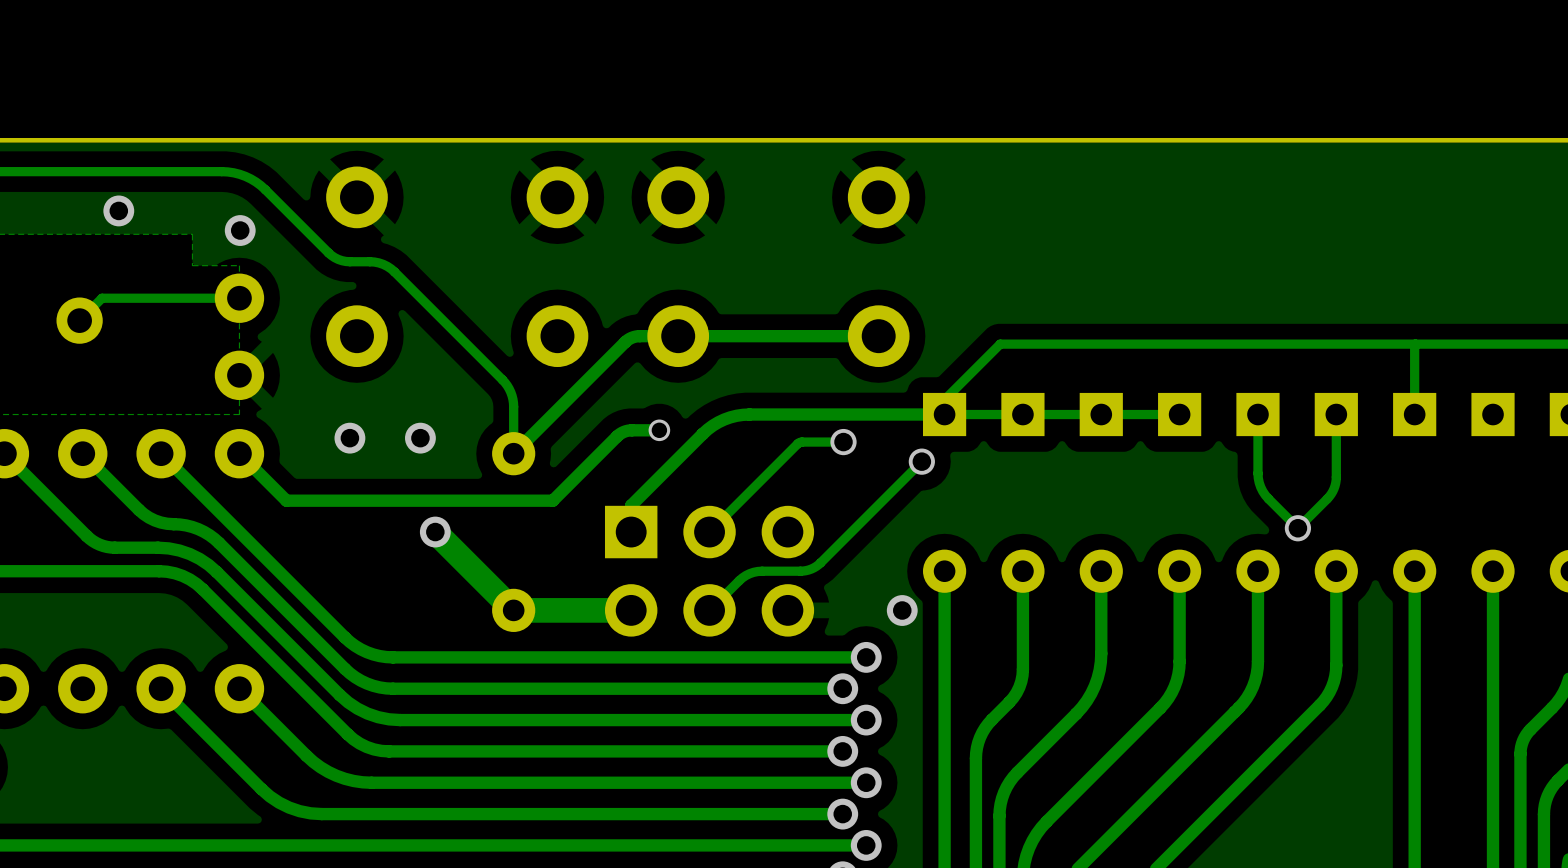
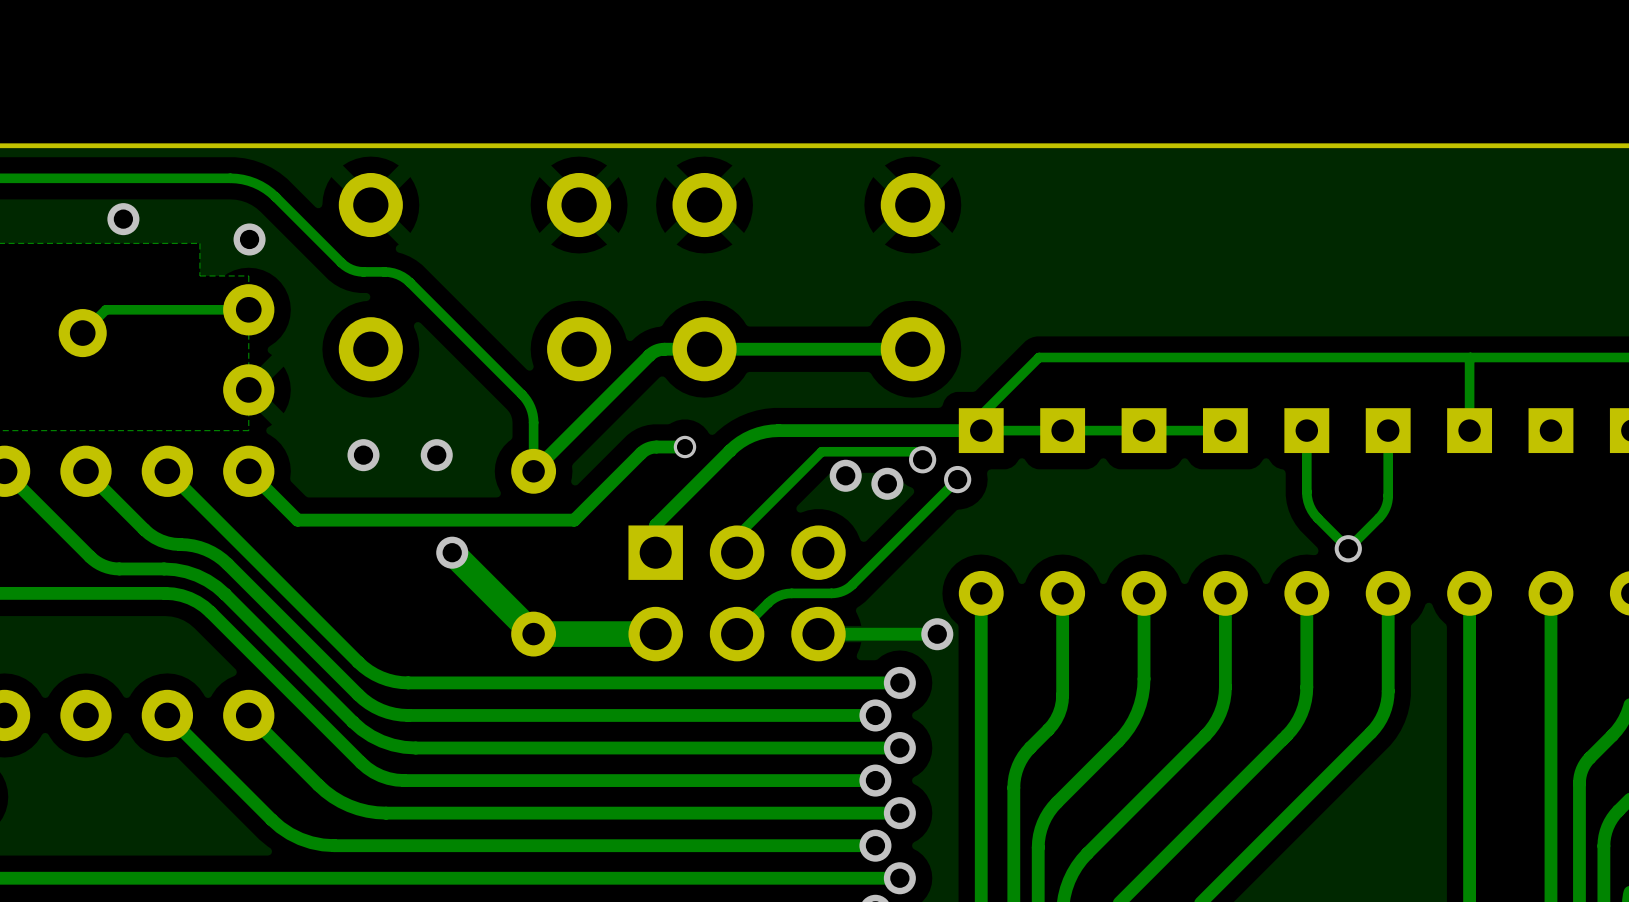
track: (843, 442) (798, 443) (709, 532) -> (922, 459) (914, 451) (821, 451) (737, 536) (737, 552)
via position: (843, 442) -> (922, 459)
via: none -> (845, 475)
via: none -> (887, 483)
track: none -> (937, 634) (818, 634)

